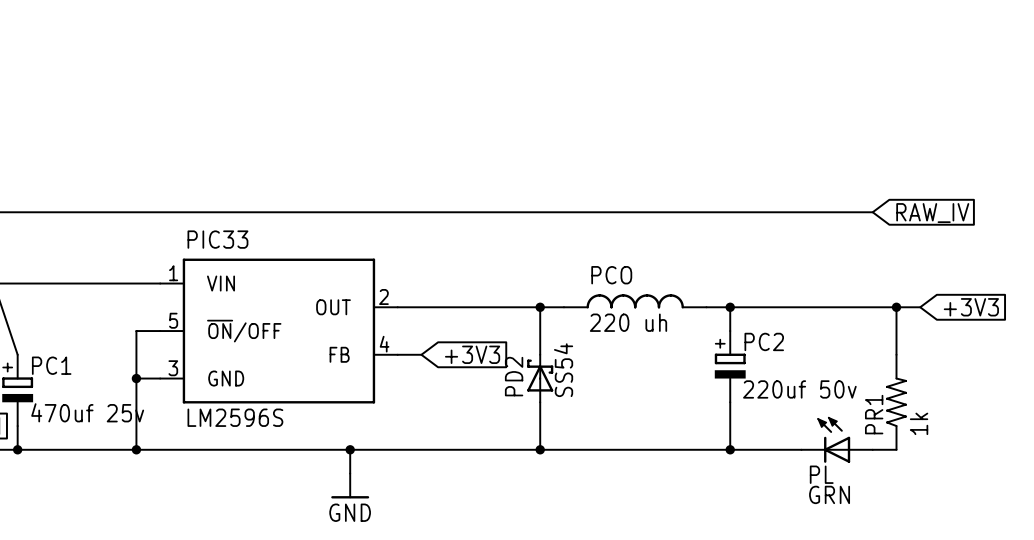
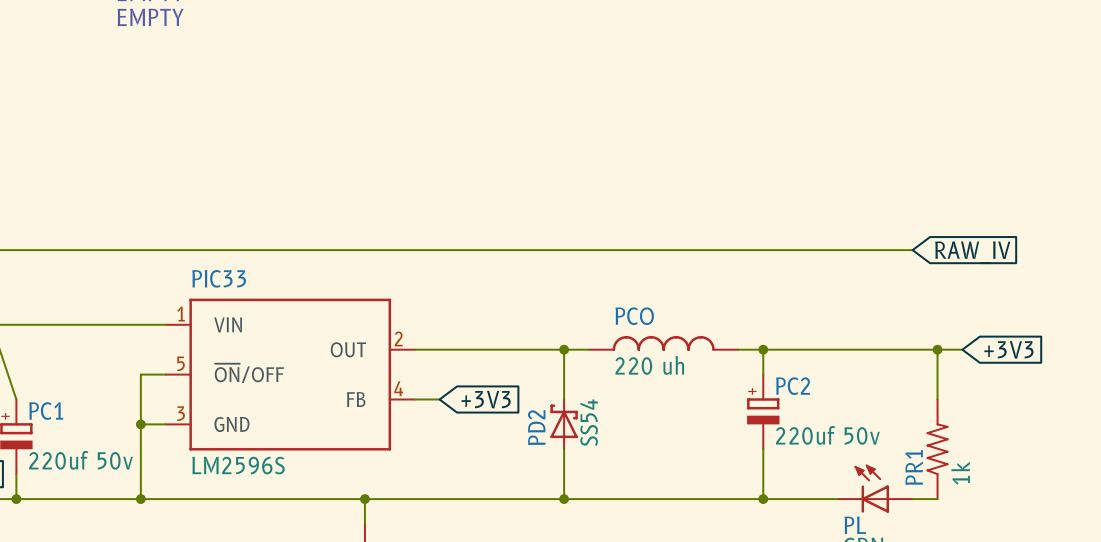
PC1 value: 470uf 25v (87, 412) -> 220uf 50v (81, 460)

